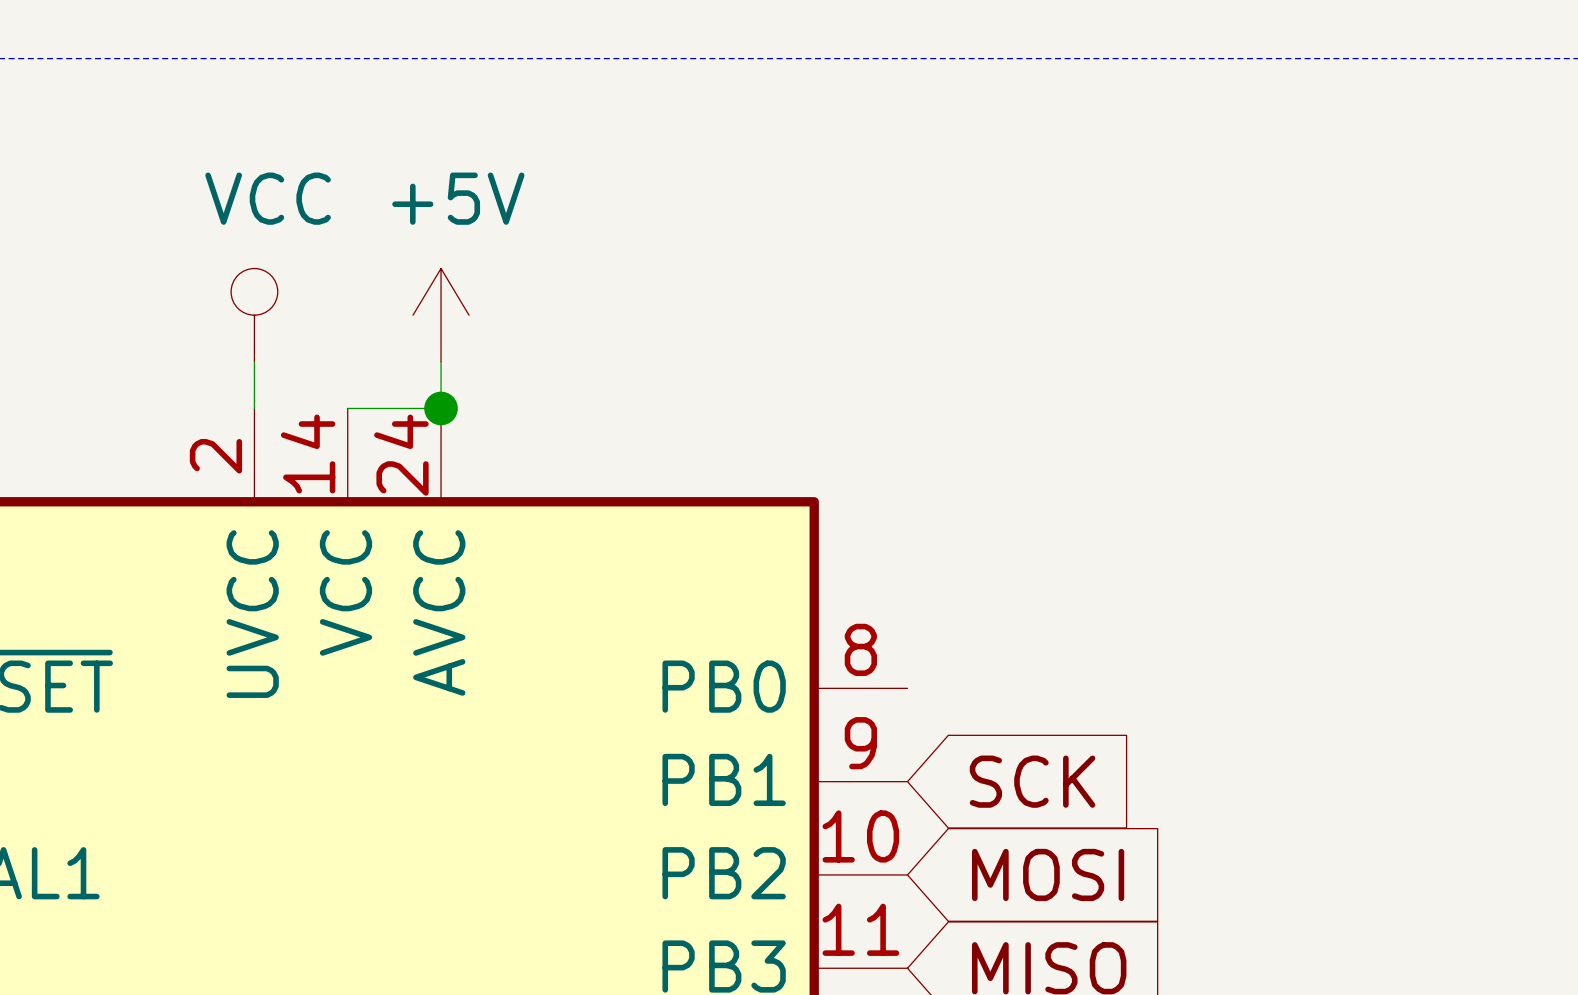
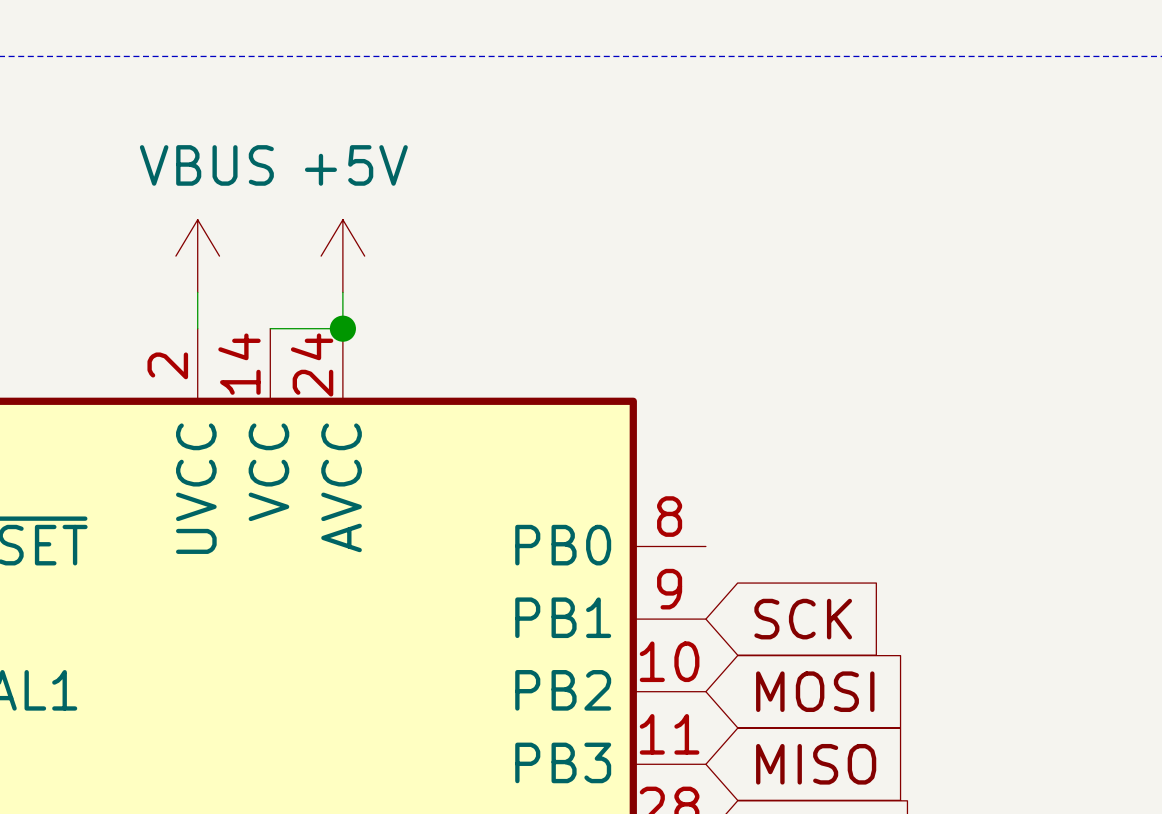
power symbol: VCC (254, 315) -> VBUS (197, 256)

